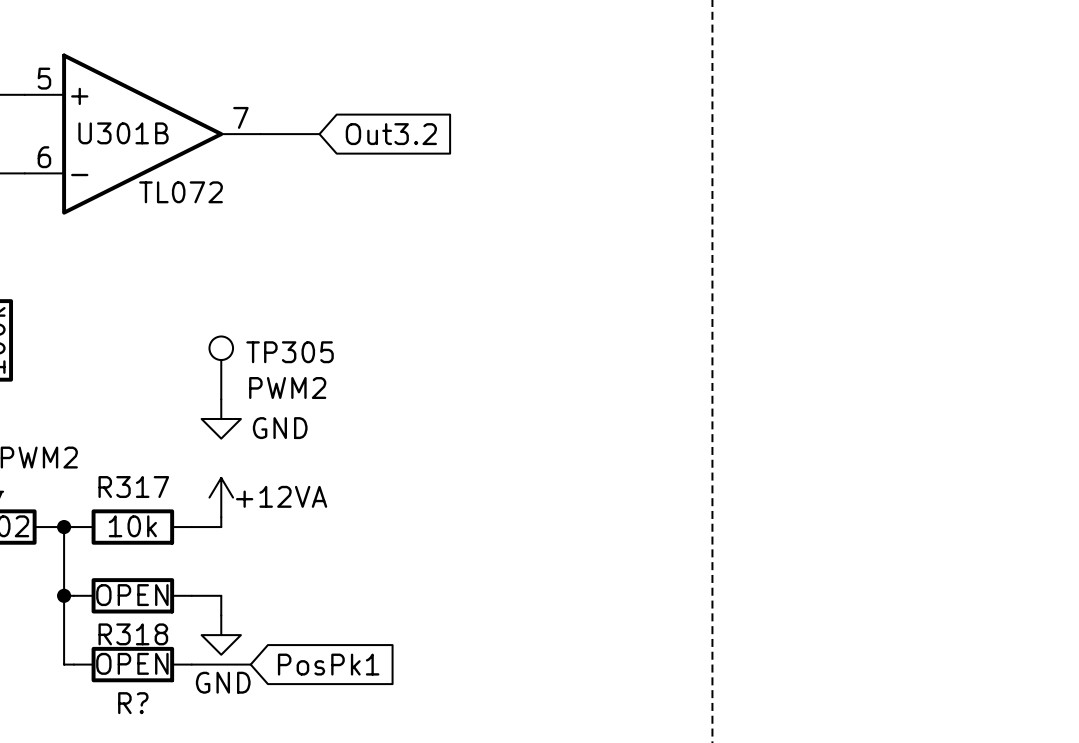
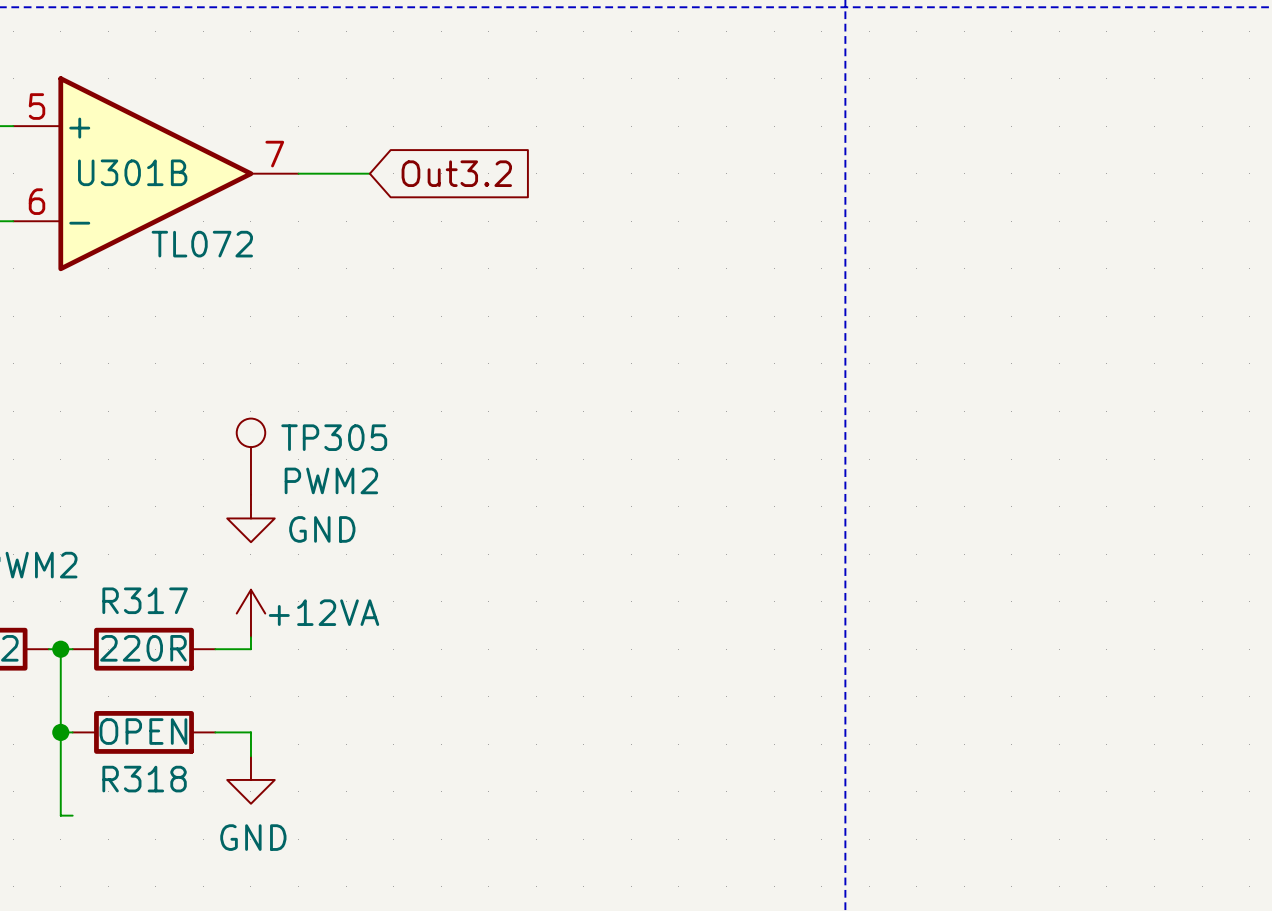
R317 value: 10k (132, 526) -> 220R (143, 648)
R?: OPEN (132, 664) -> none
wire: (191, 664) (250, 664) -> none
global label: PosPk1 (328, 664) -> none

